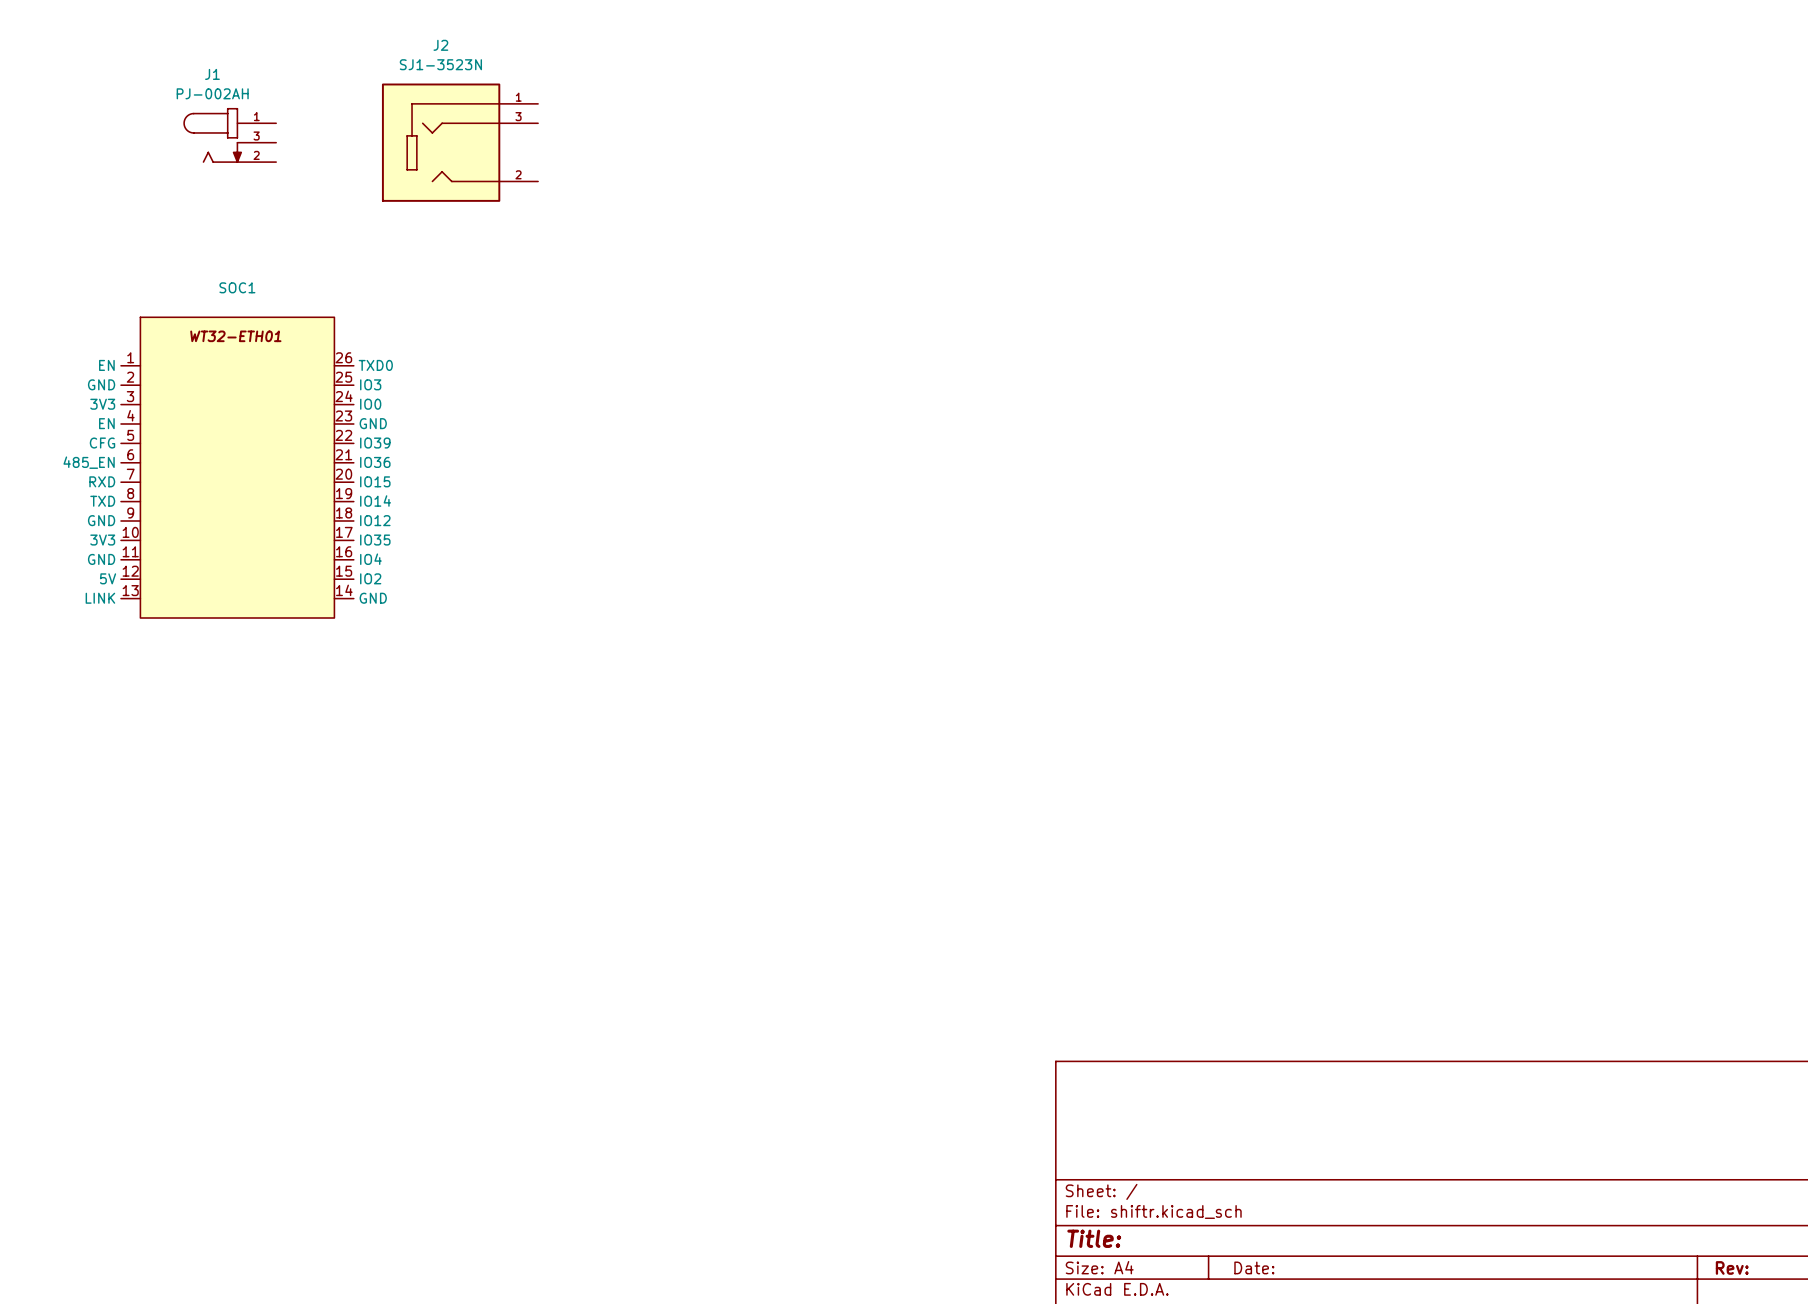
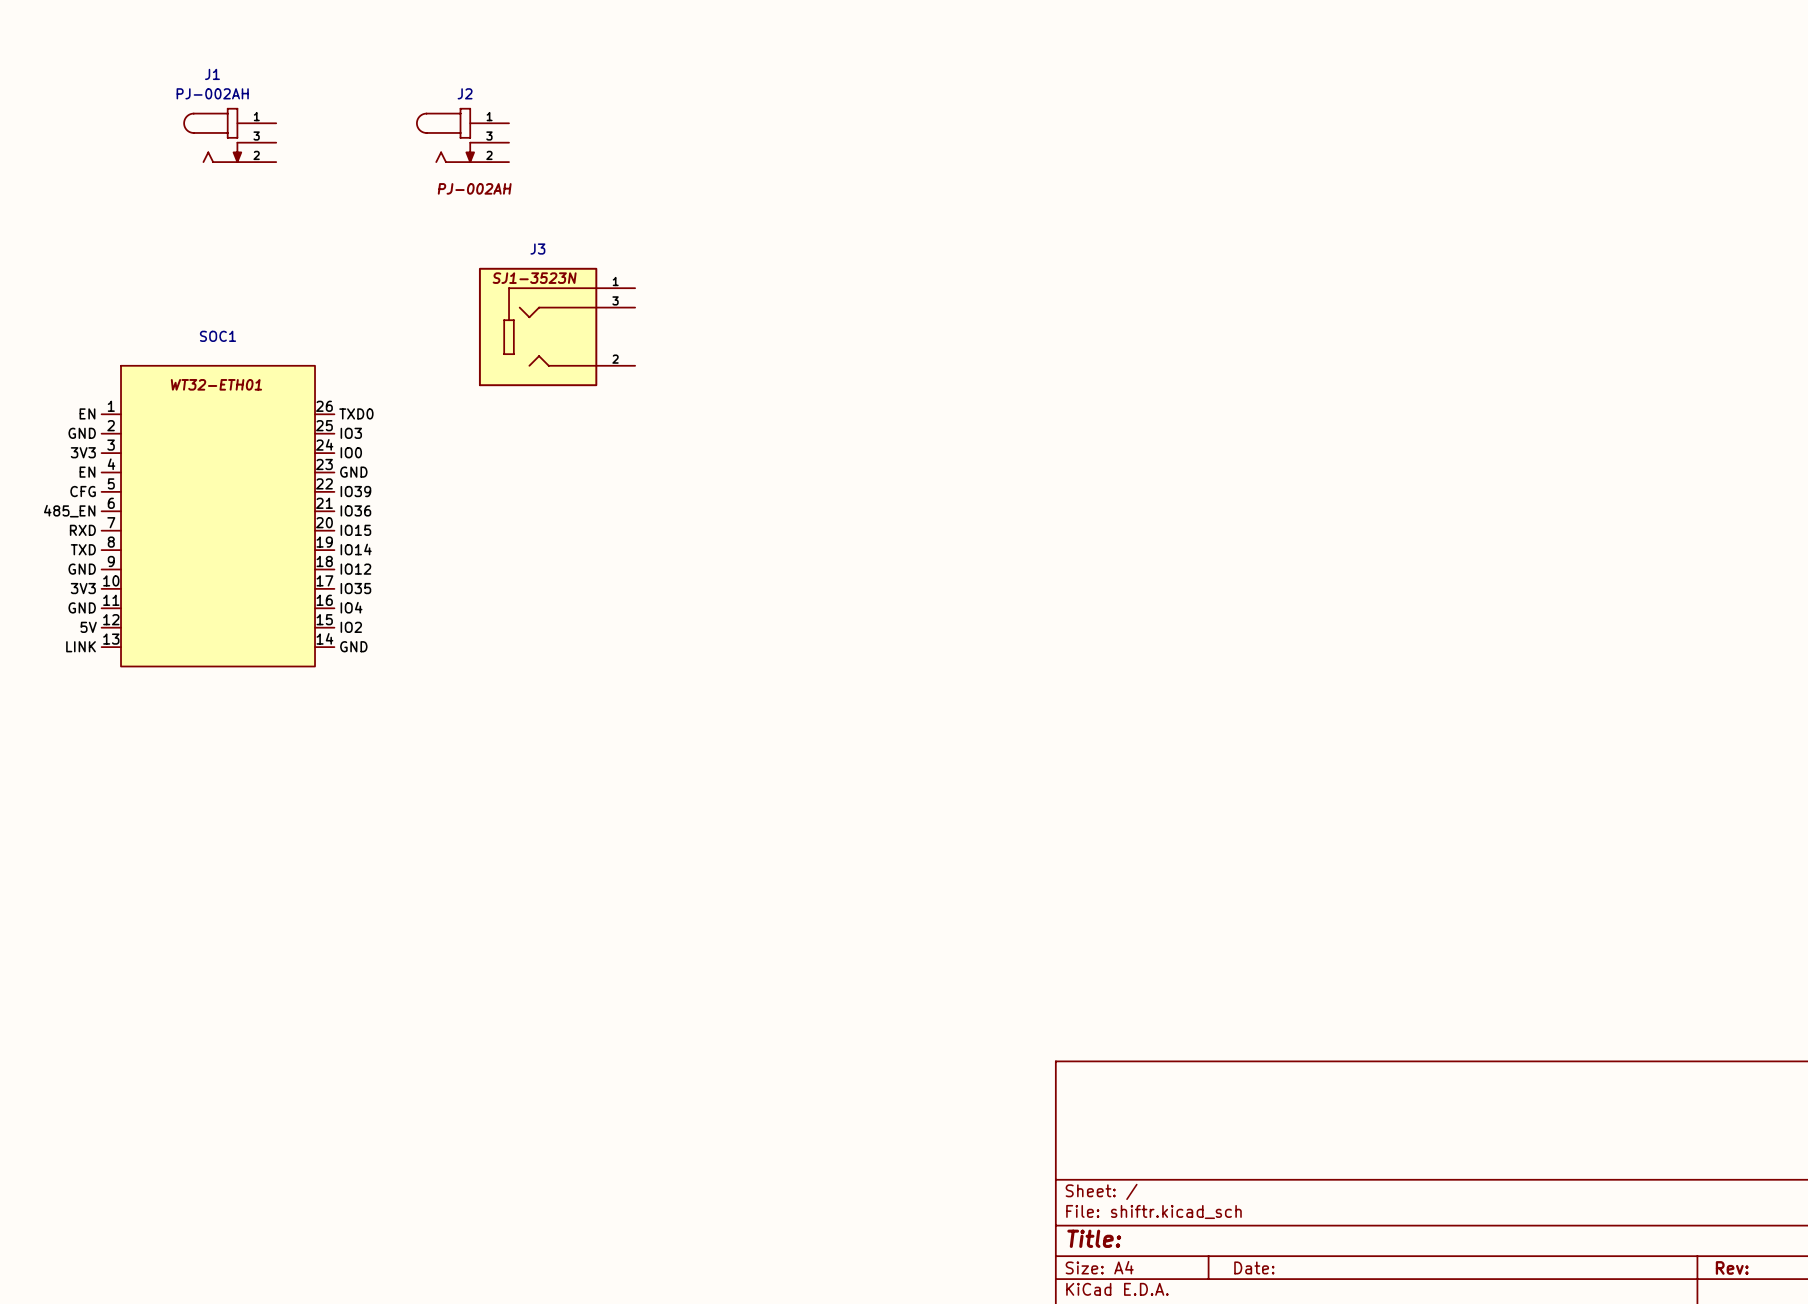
J2 name position: J2 (440, 45) -> J2 (465, 93)
J2 value: SJ1-3523N (440, 64) -> none
J2 symbol: [381, 83, 539, 202] -> [416, 108, 510, 163]
J3: none -> (557, 326)
SOC1 position: (237, 467) -> (218, 516)

